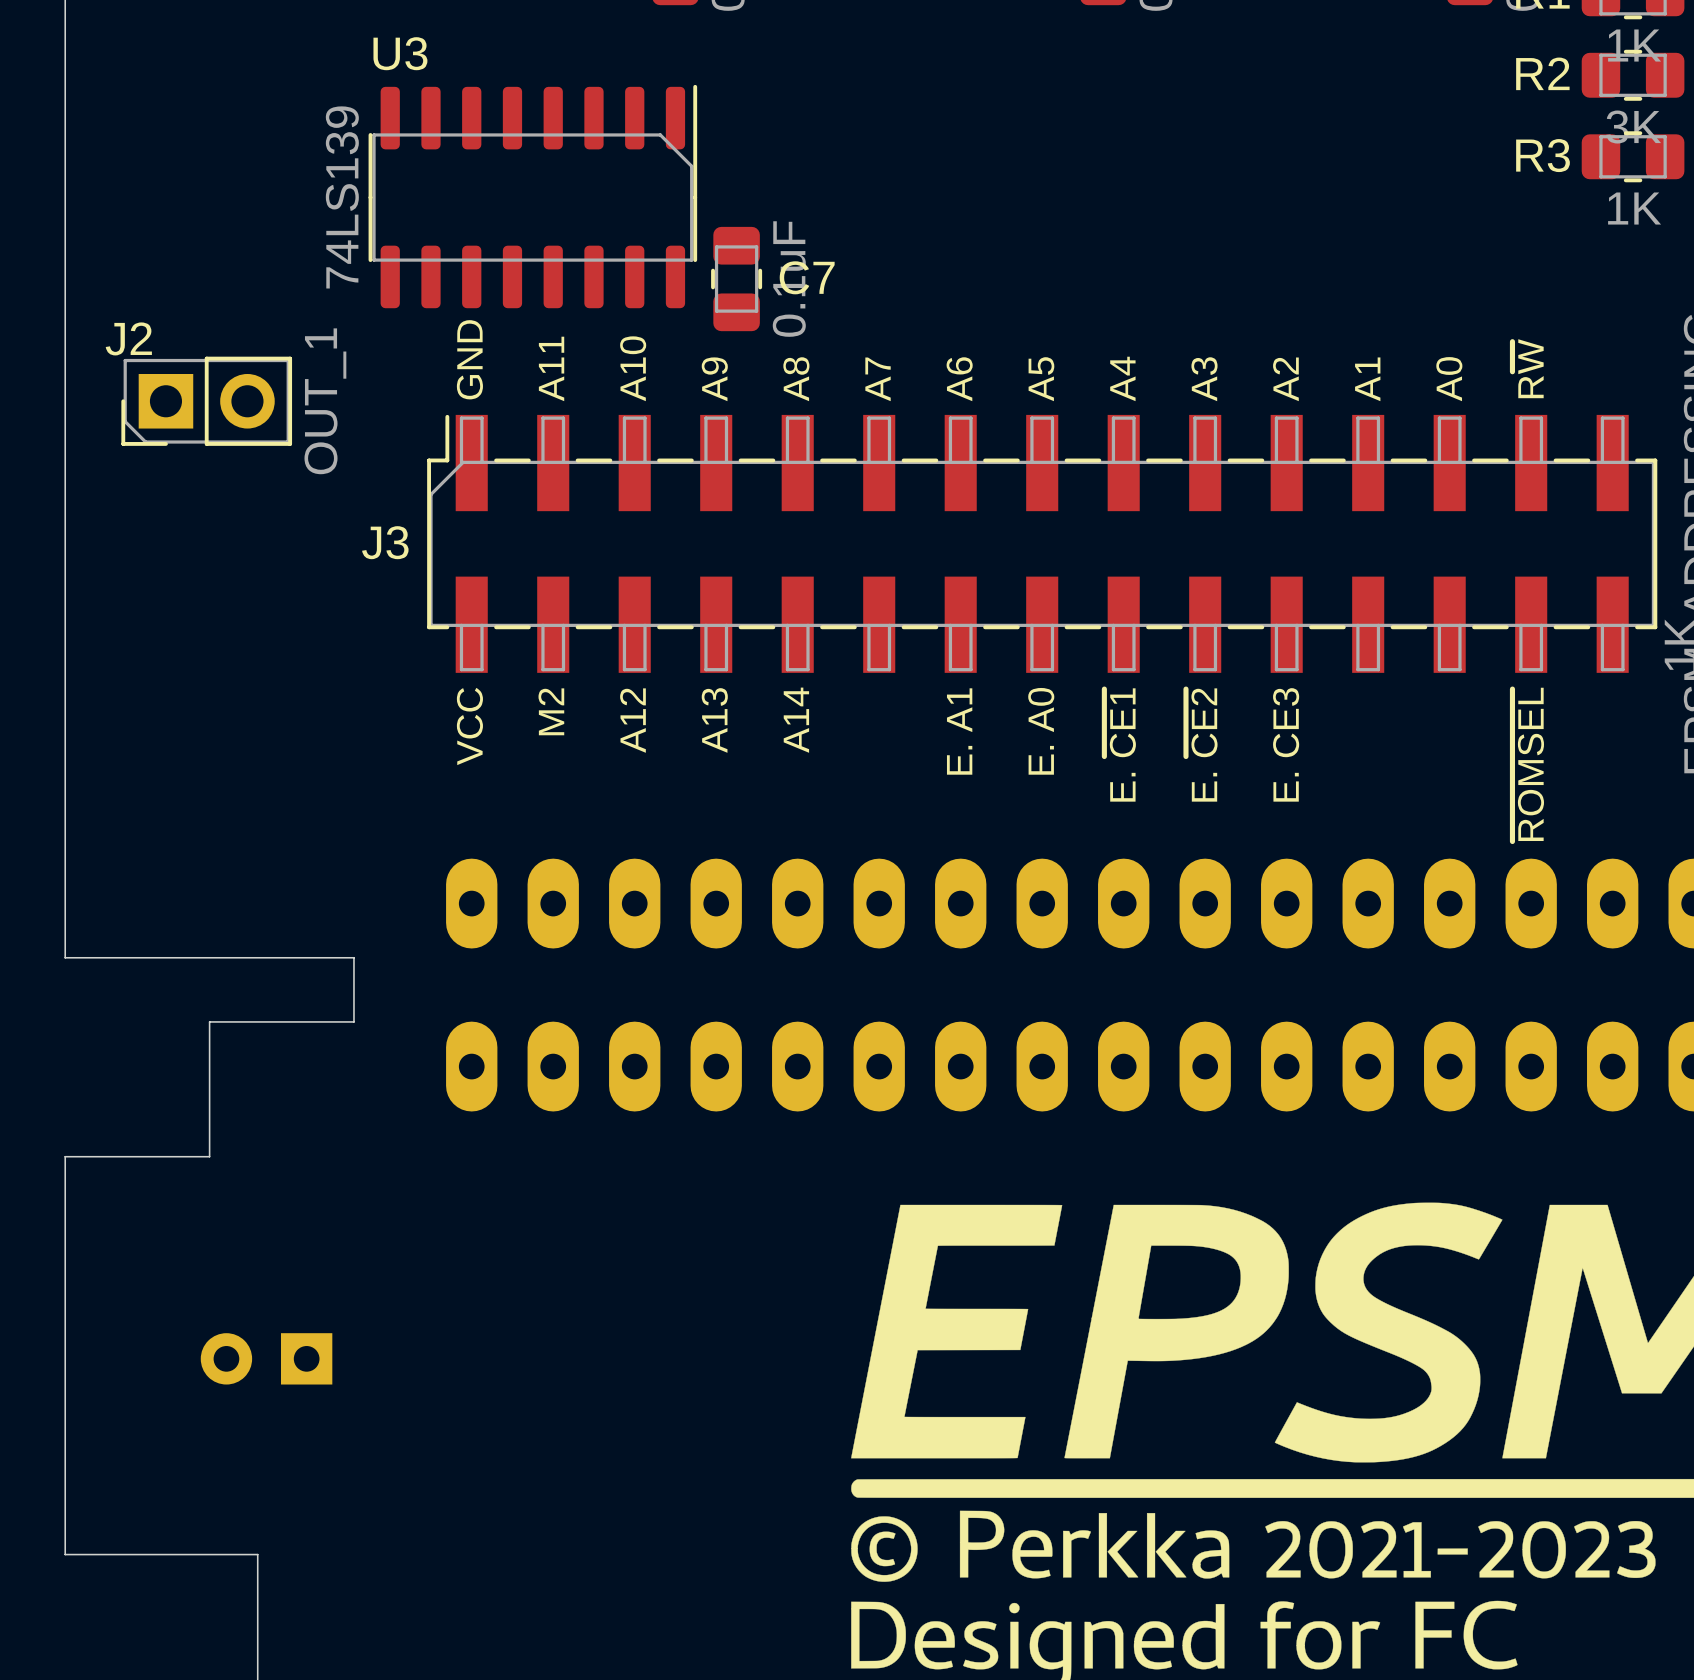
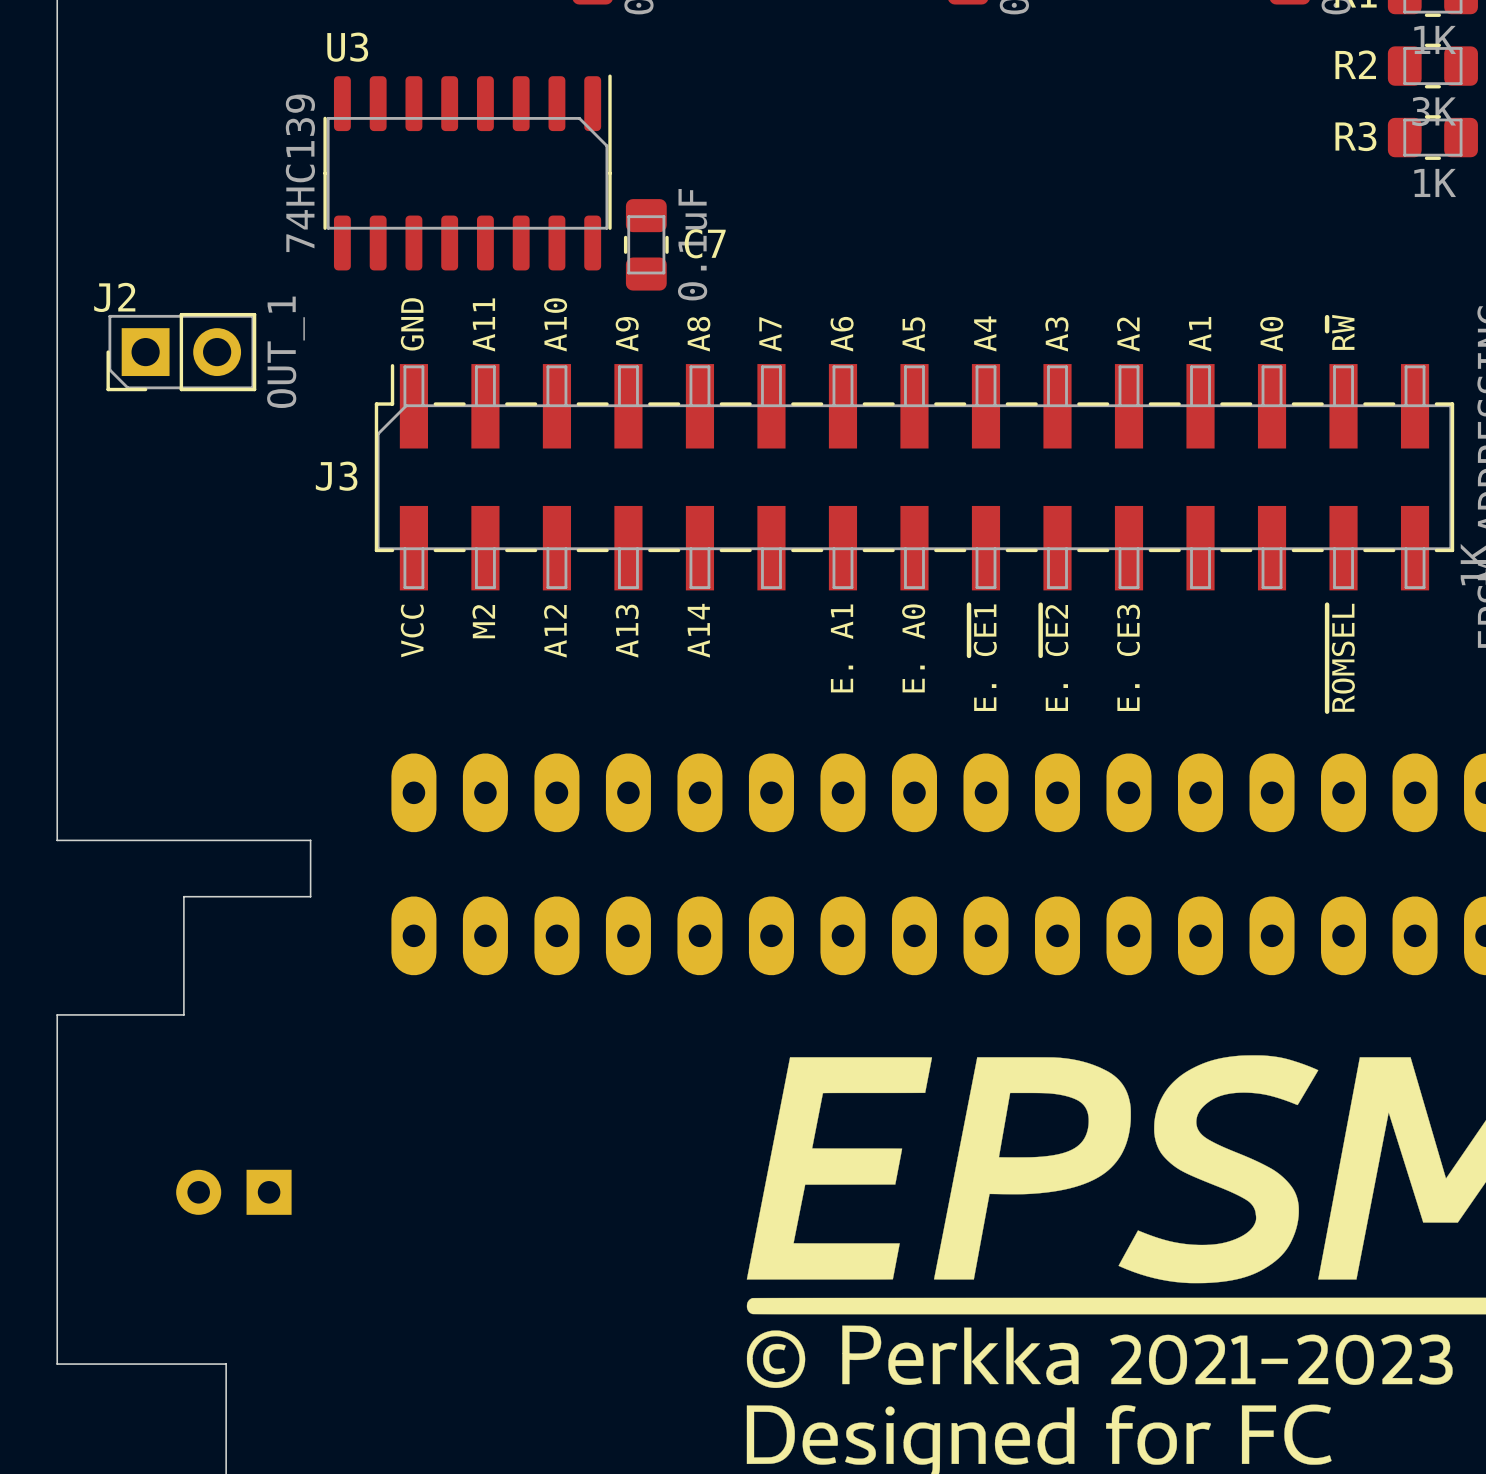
U3 value: 74LS139 (342, 197) -> 74HC139 (300, 173)

